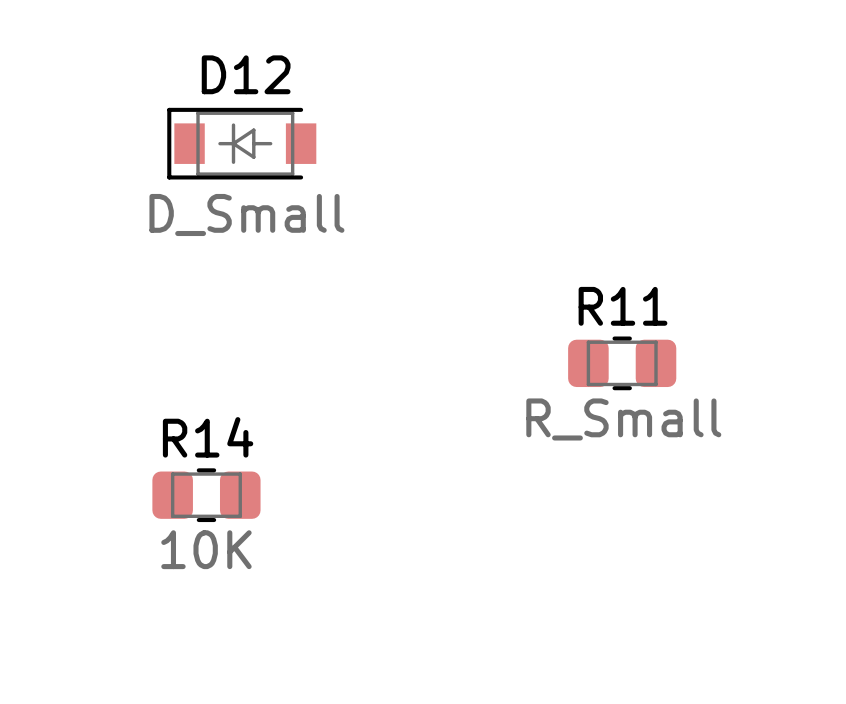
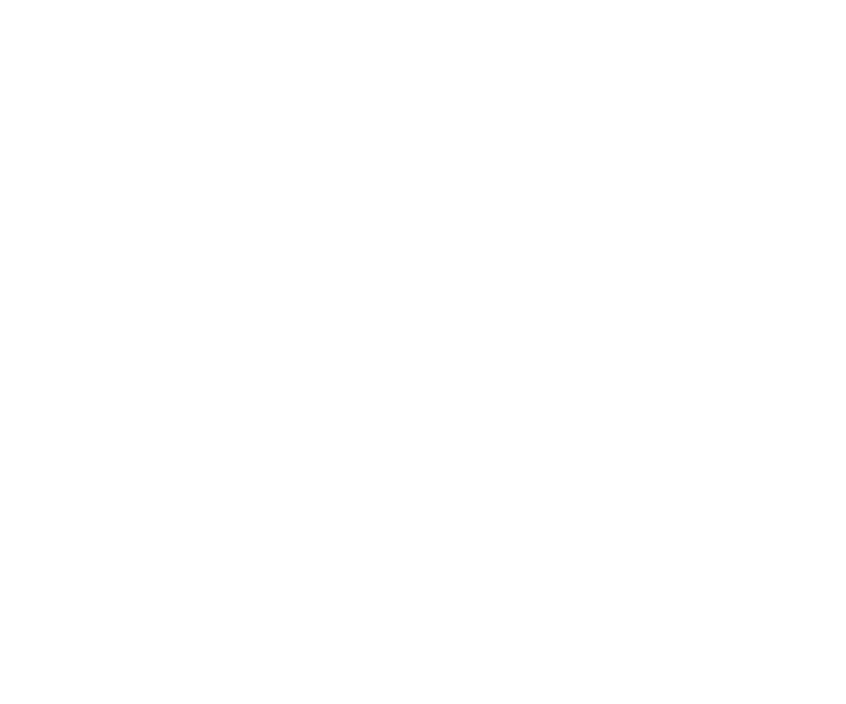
D12: D_Small (241, 143) -> none
R11: R_Small (622, 363) -> none
R14: 10K (206, 495) -> none

